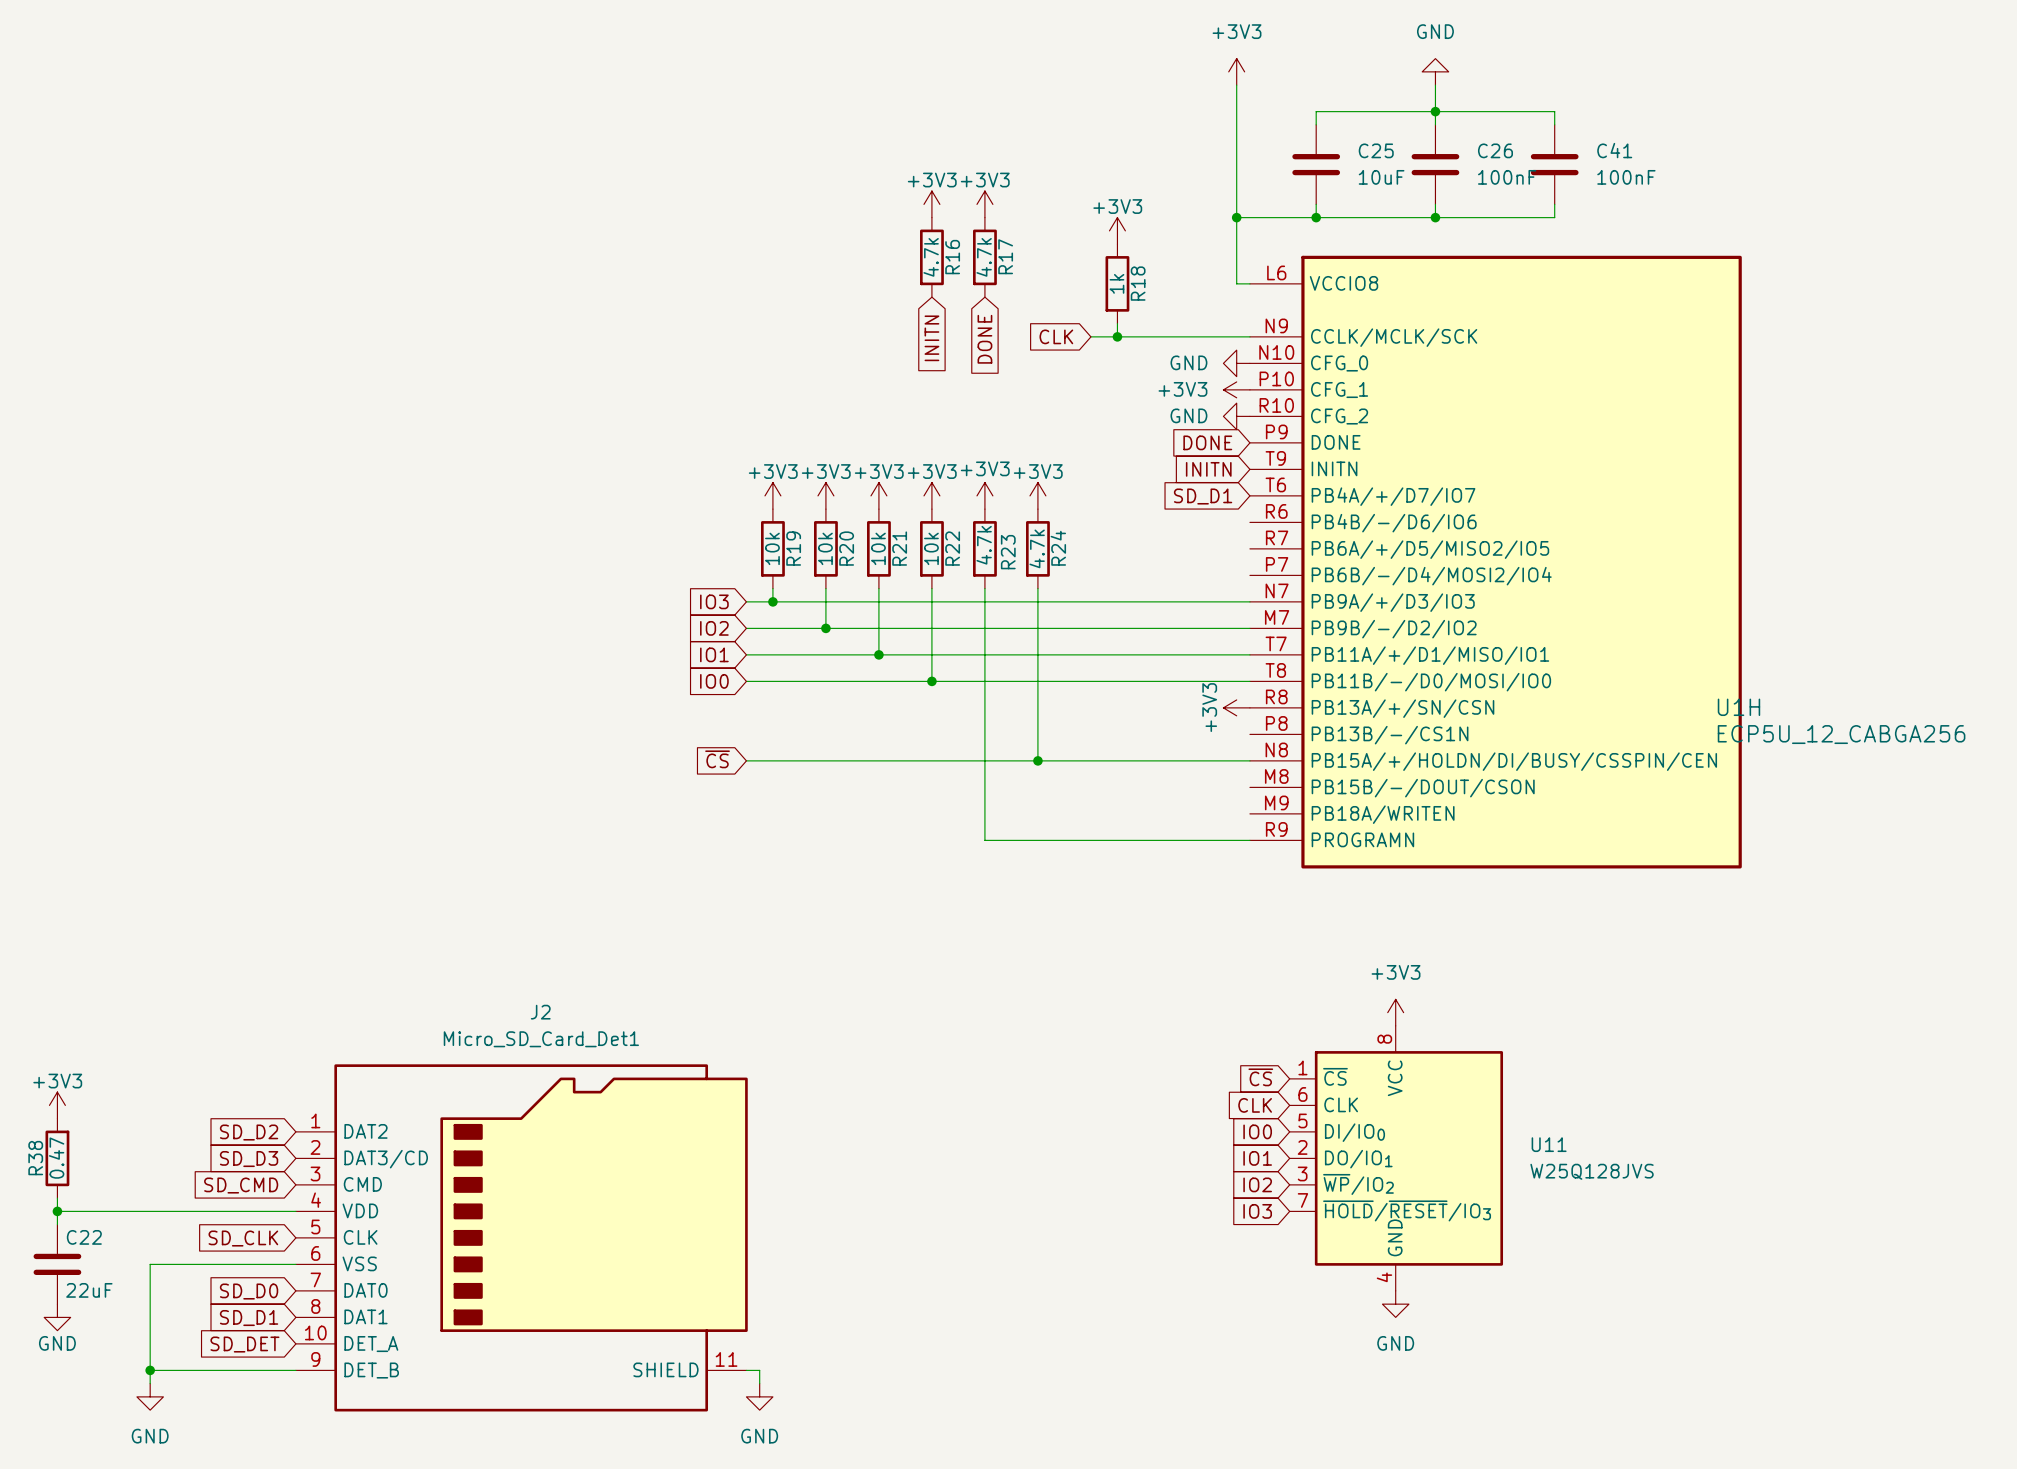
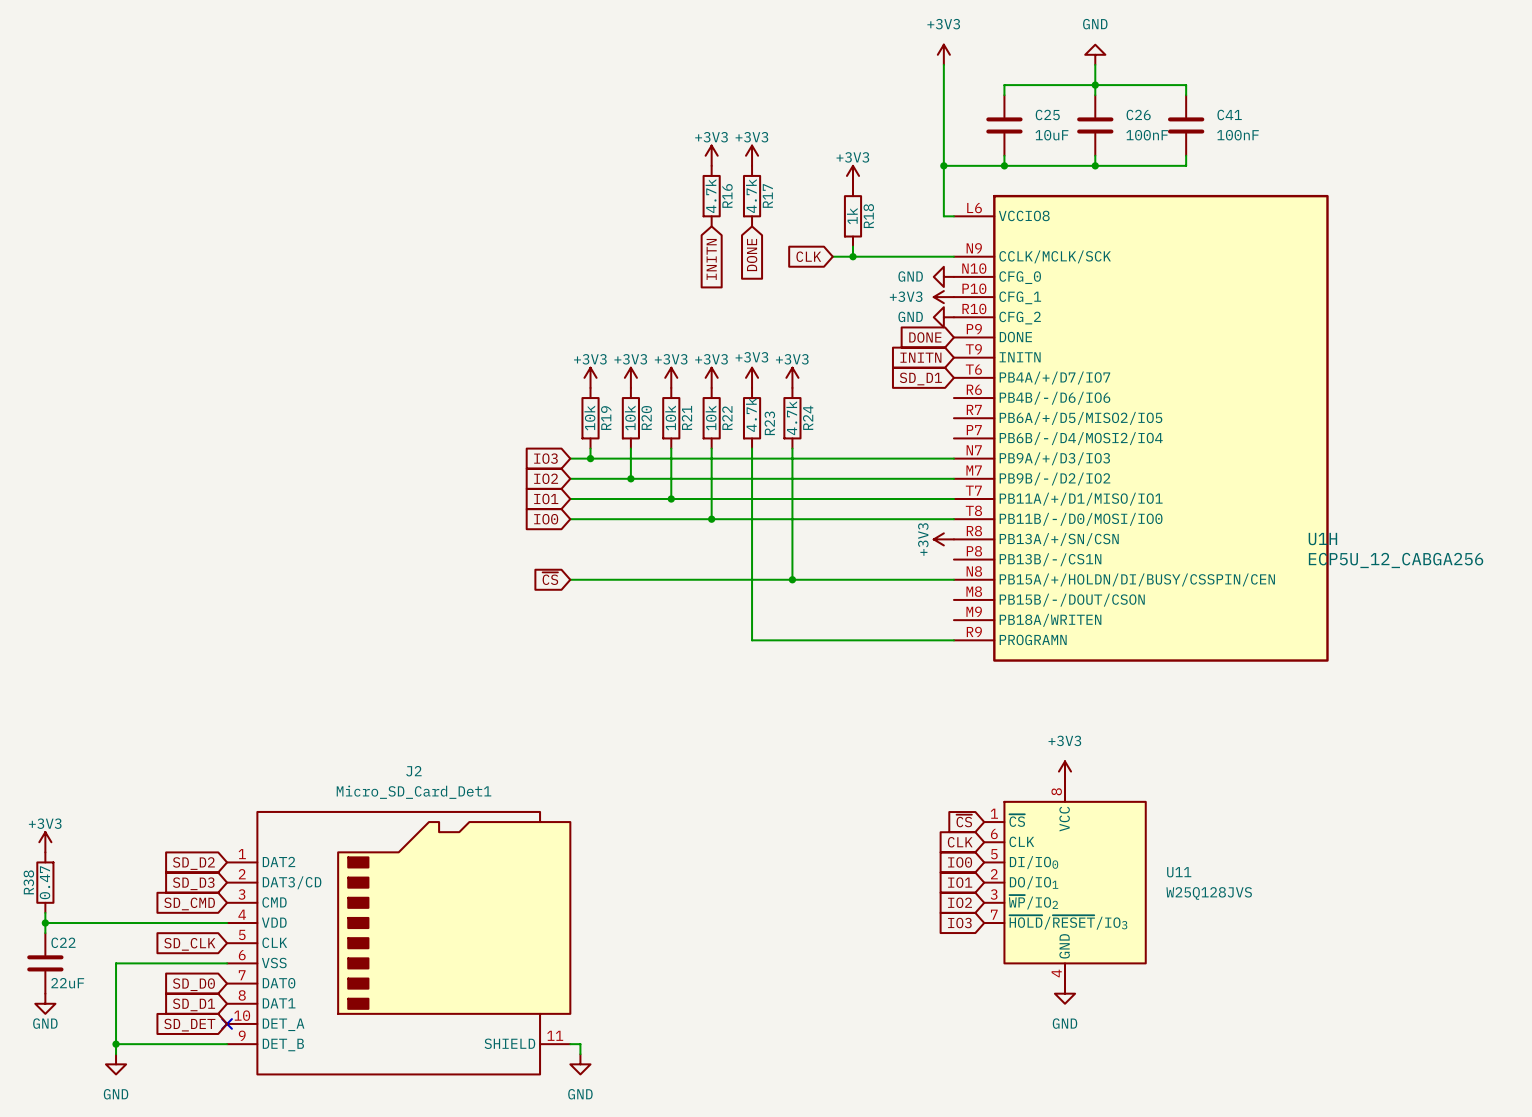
no-connect mark: none -> (227, 1023)

